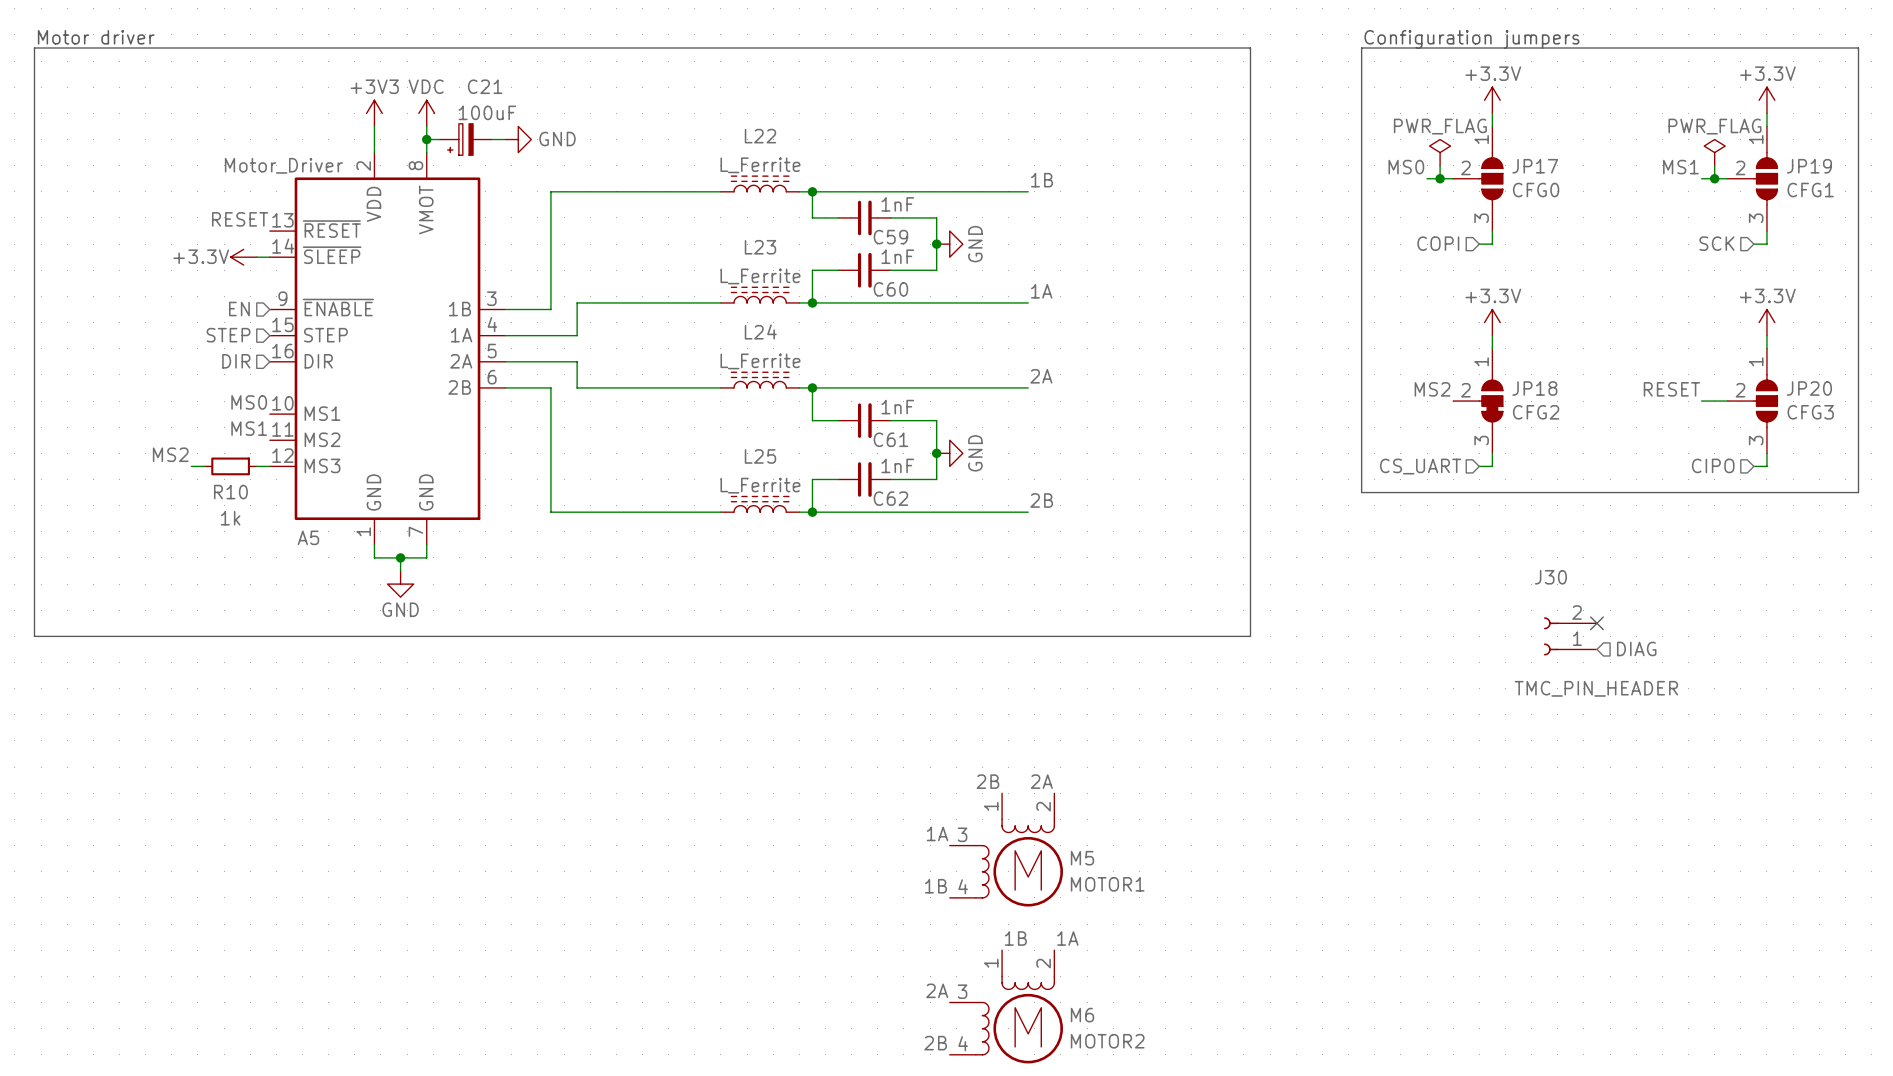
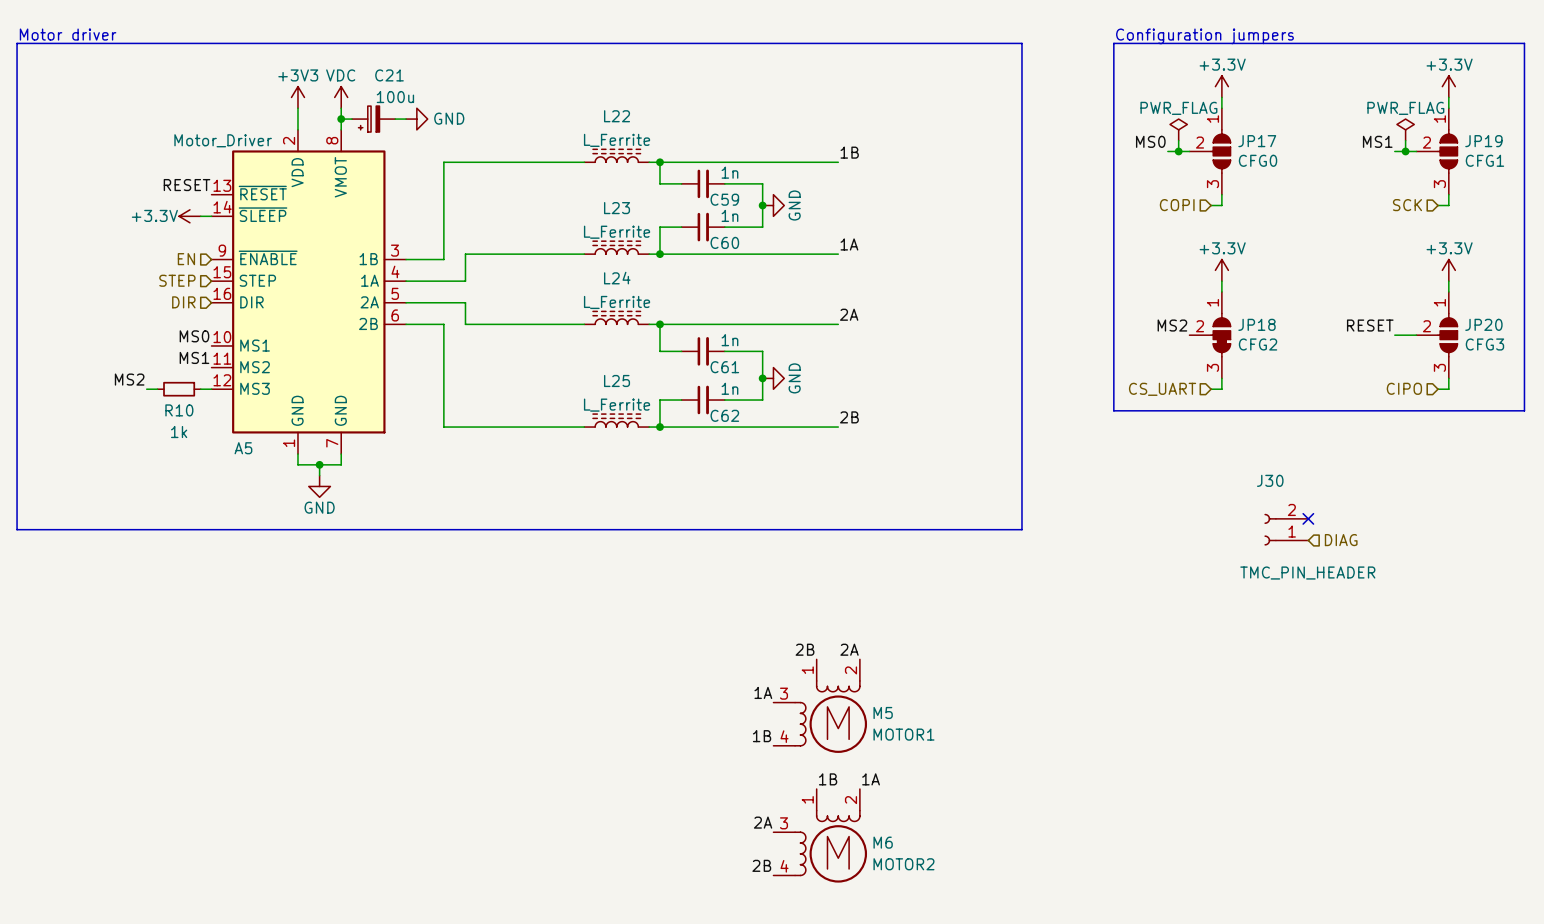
C21 value: 100uF (487, 112) -> 100u (395, 97)
C59 value: 1nF (897, 204) -> 1n (729, 172)
C60 value: 1nF (897, 256) -> 1n (729, 215)
C61 value: 1nF (897, 407) -> 1n (729, 340)
C62 value: 1nF (897, 465) -> 1n (729, 388)

